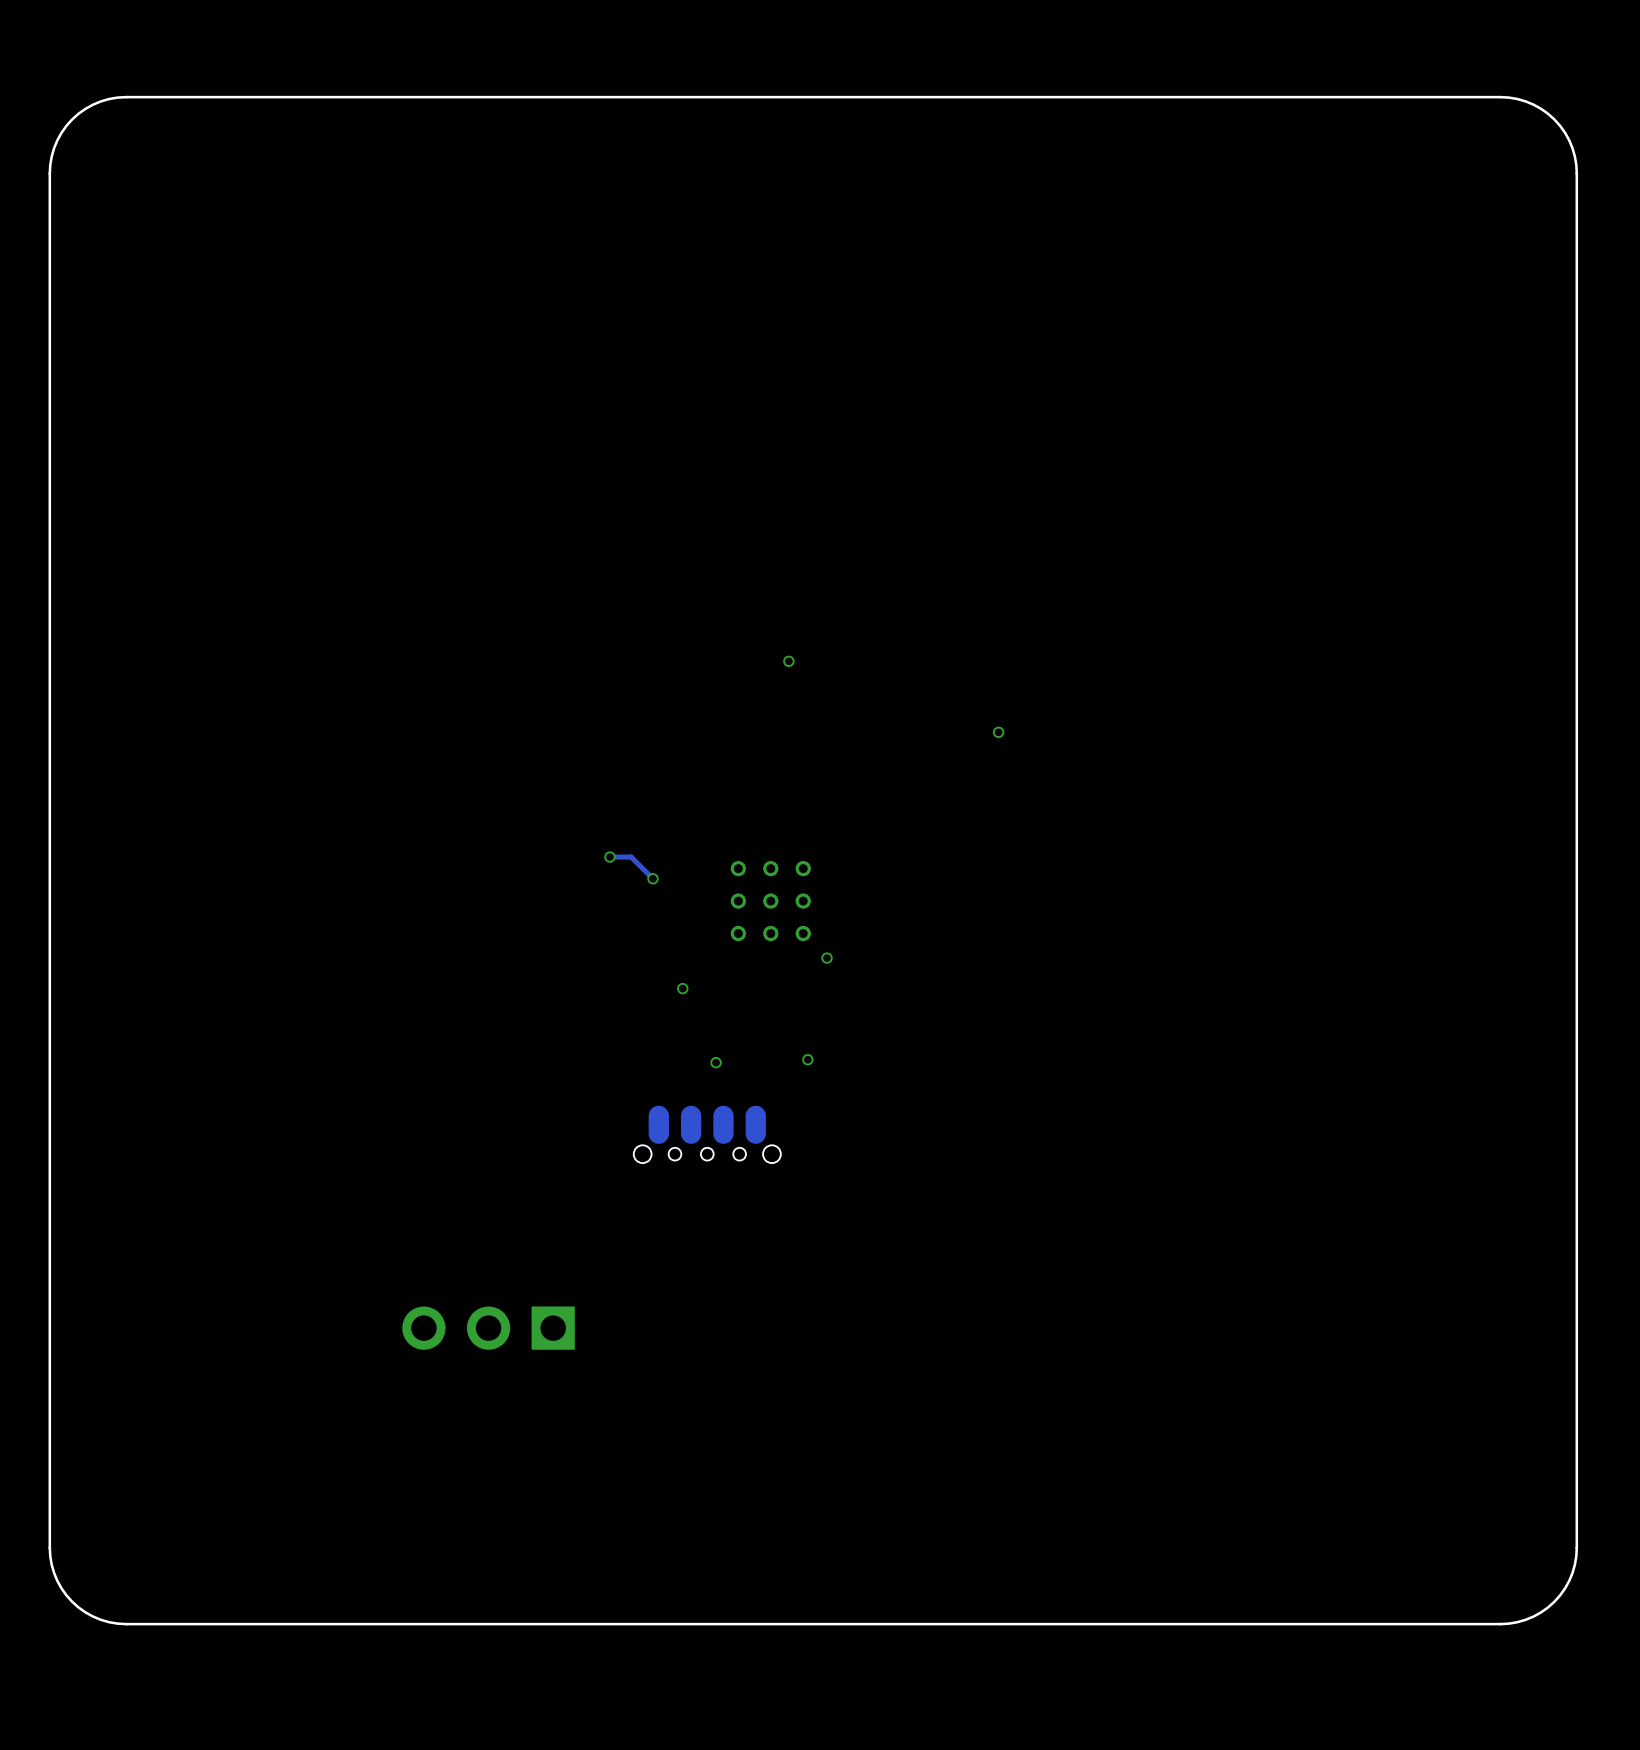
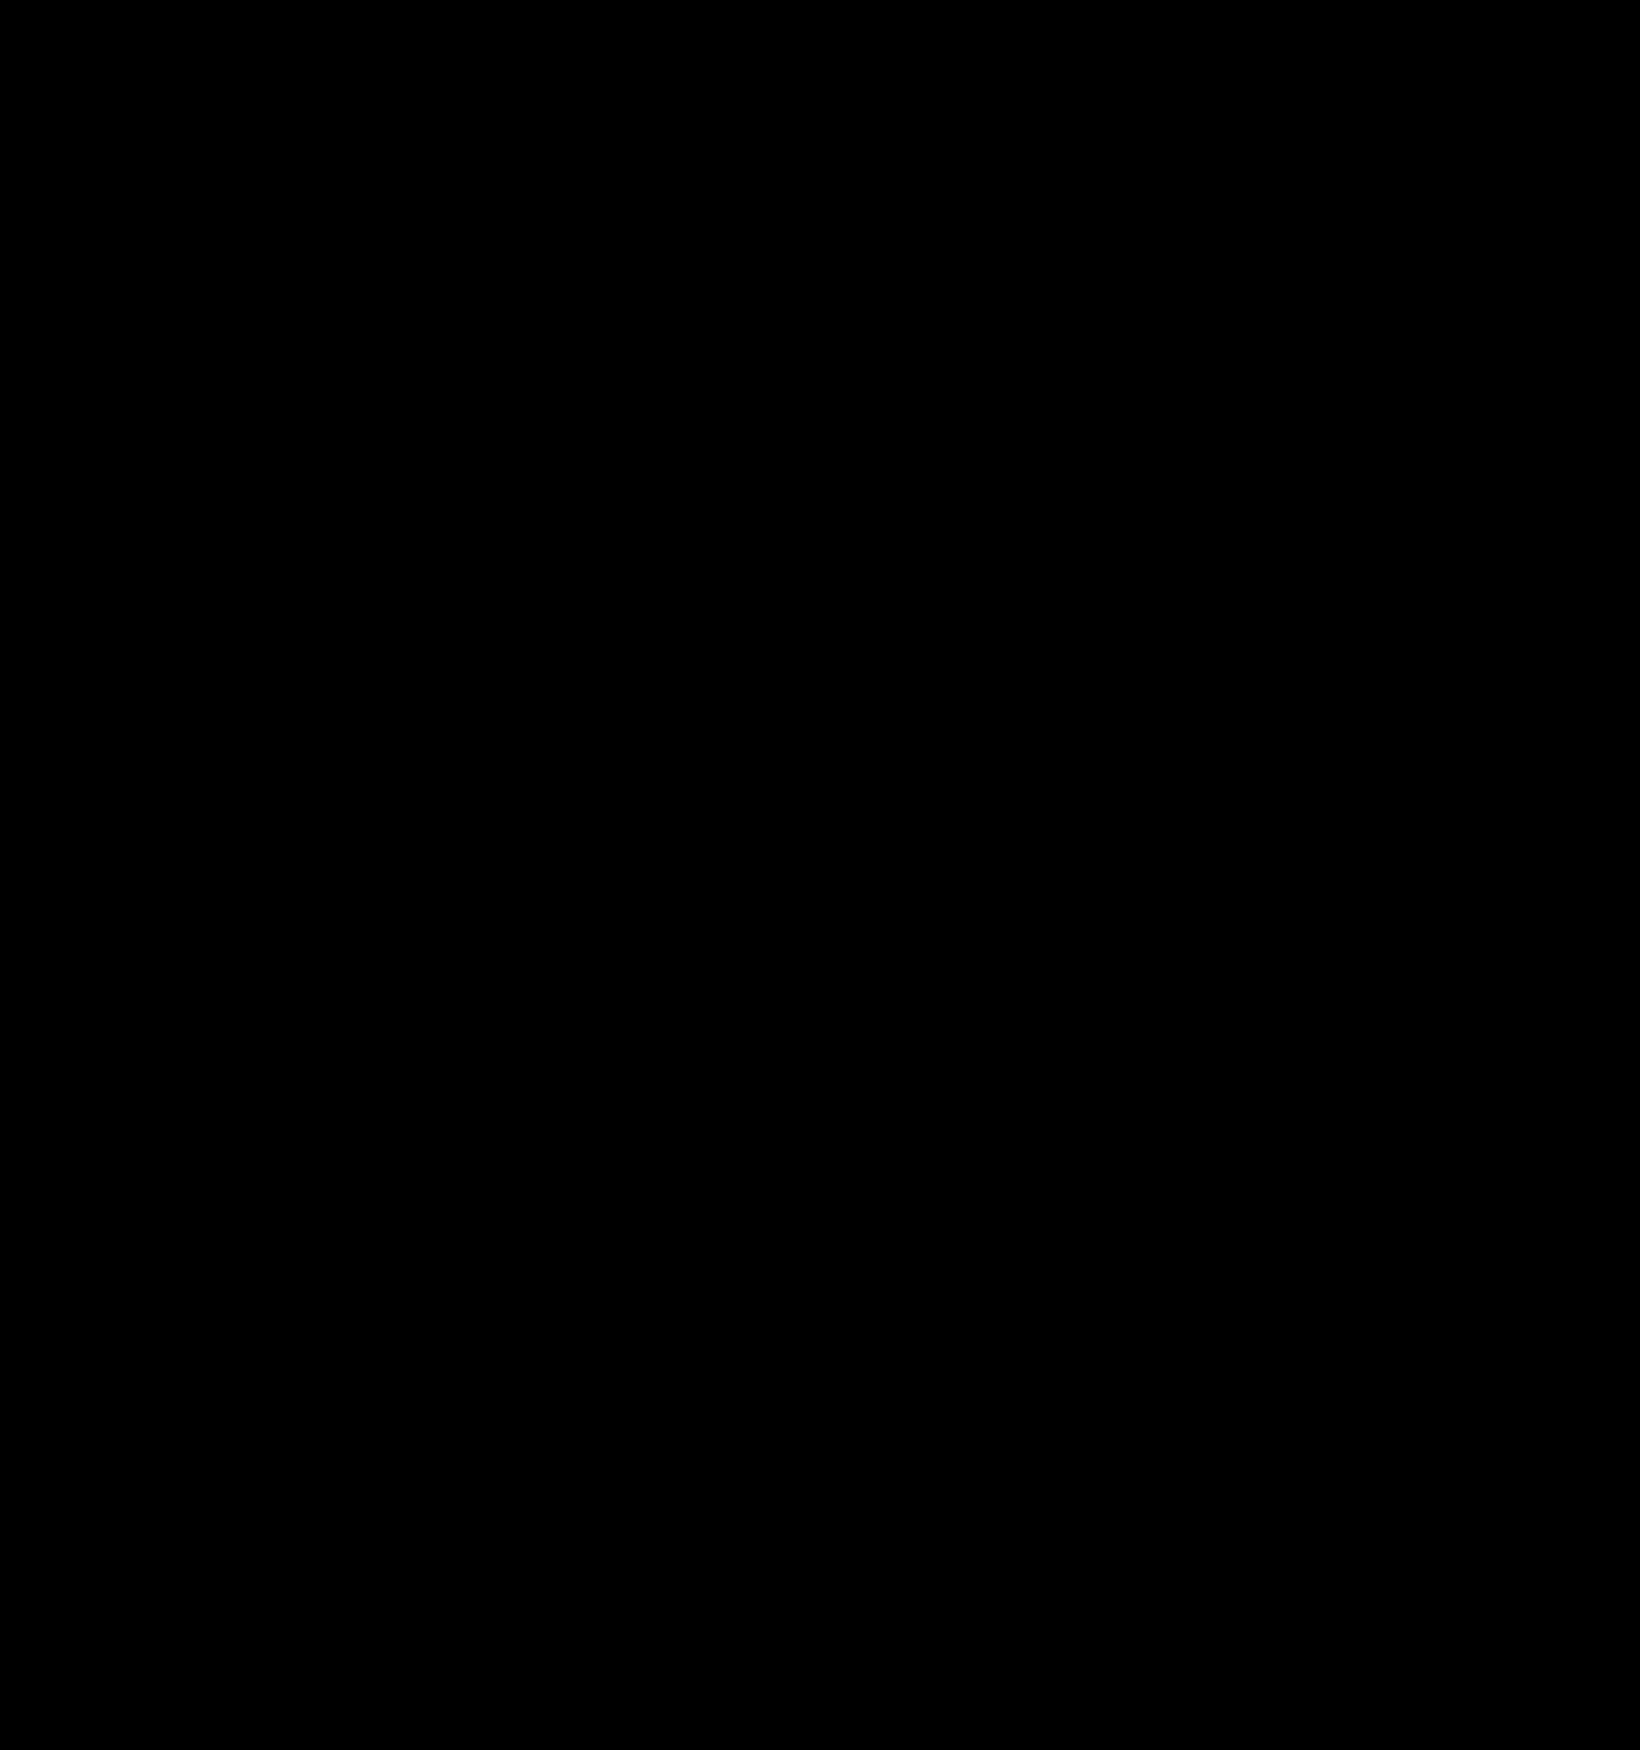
board edge: (1500, 97) (126, 97) (109, 99) (93, 104) (72, 119) (57, 140) (51, 156) (49, 173) (49, 1547) (54, 1572) (61, 1588) (72, 1601) (85, 1612) (100, 1619) (126, 1624) (1500, 1624) (1525, 1619) (1541, 1612) (1554, 1601) (1565, 1588) (1572, 1572) (1576, 1547) (1576, 173) (1574, 156) (1569, 140) (1554, 119) (1533, 104) (1517, 99) (1500, 97) -> none
via: (788, 661) -> none
via: (998, 732) -> none
track: (609, 857) (631, 857) (652, 878) -> none
via: (609, 857) -> none
via: (652, 878) -> none
part: (770, 901) -> none
via: (827, 958) -> none
via: (682, 988) -> none
via: (807, 1059) -> none
via: (716, 1062) -> none
part: (707, 1134) -> none
part: (488, 1328) -> none

